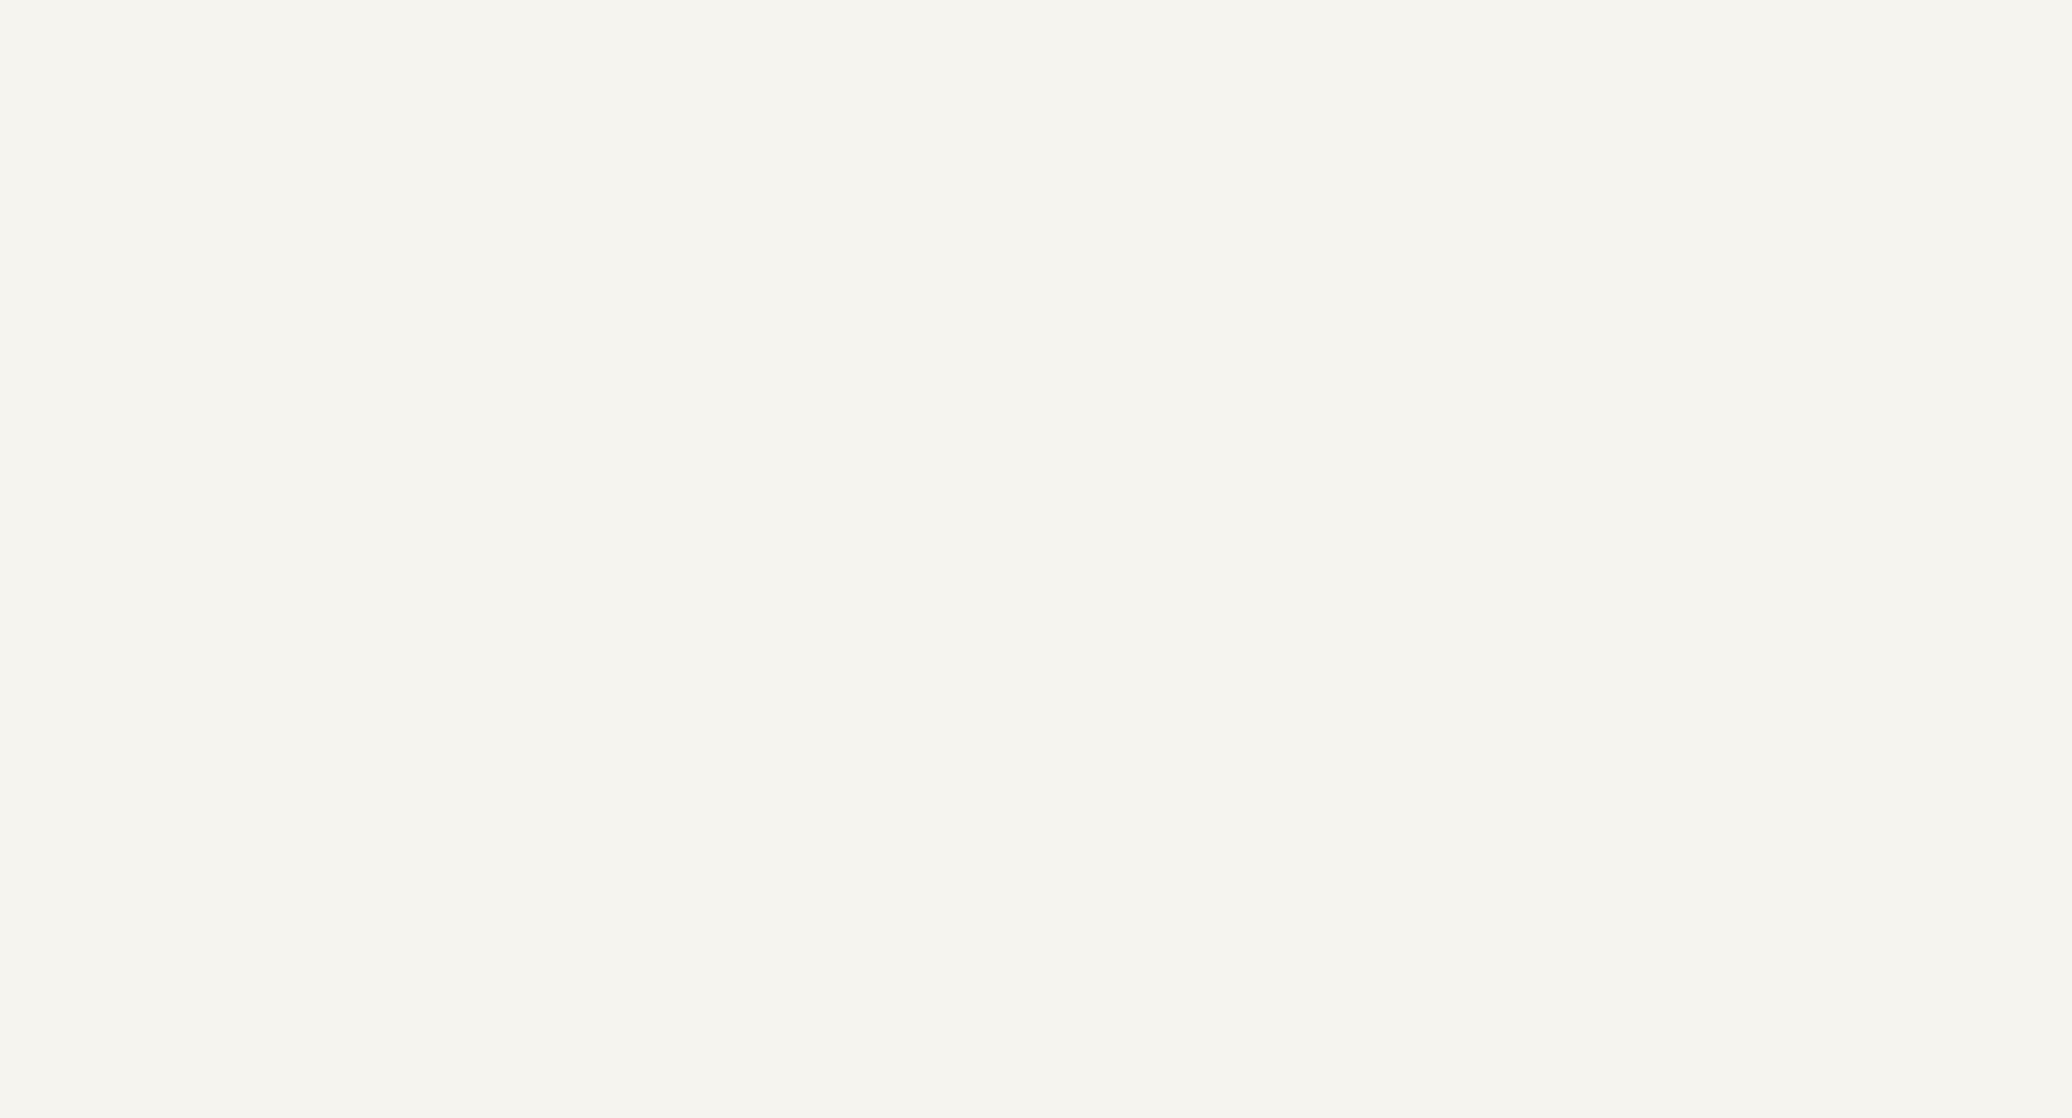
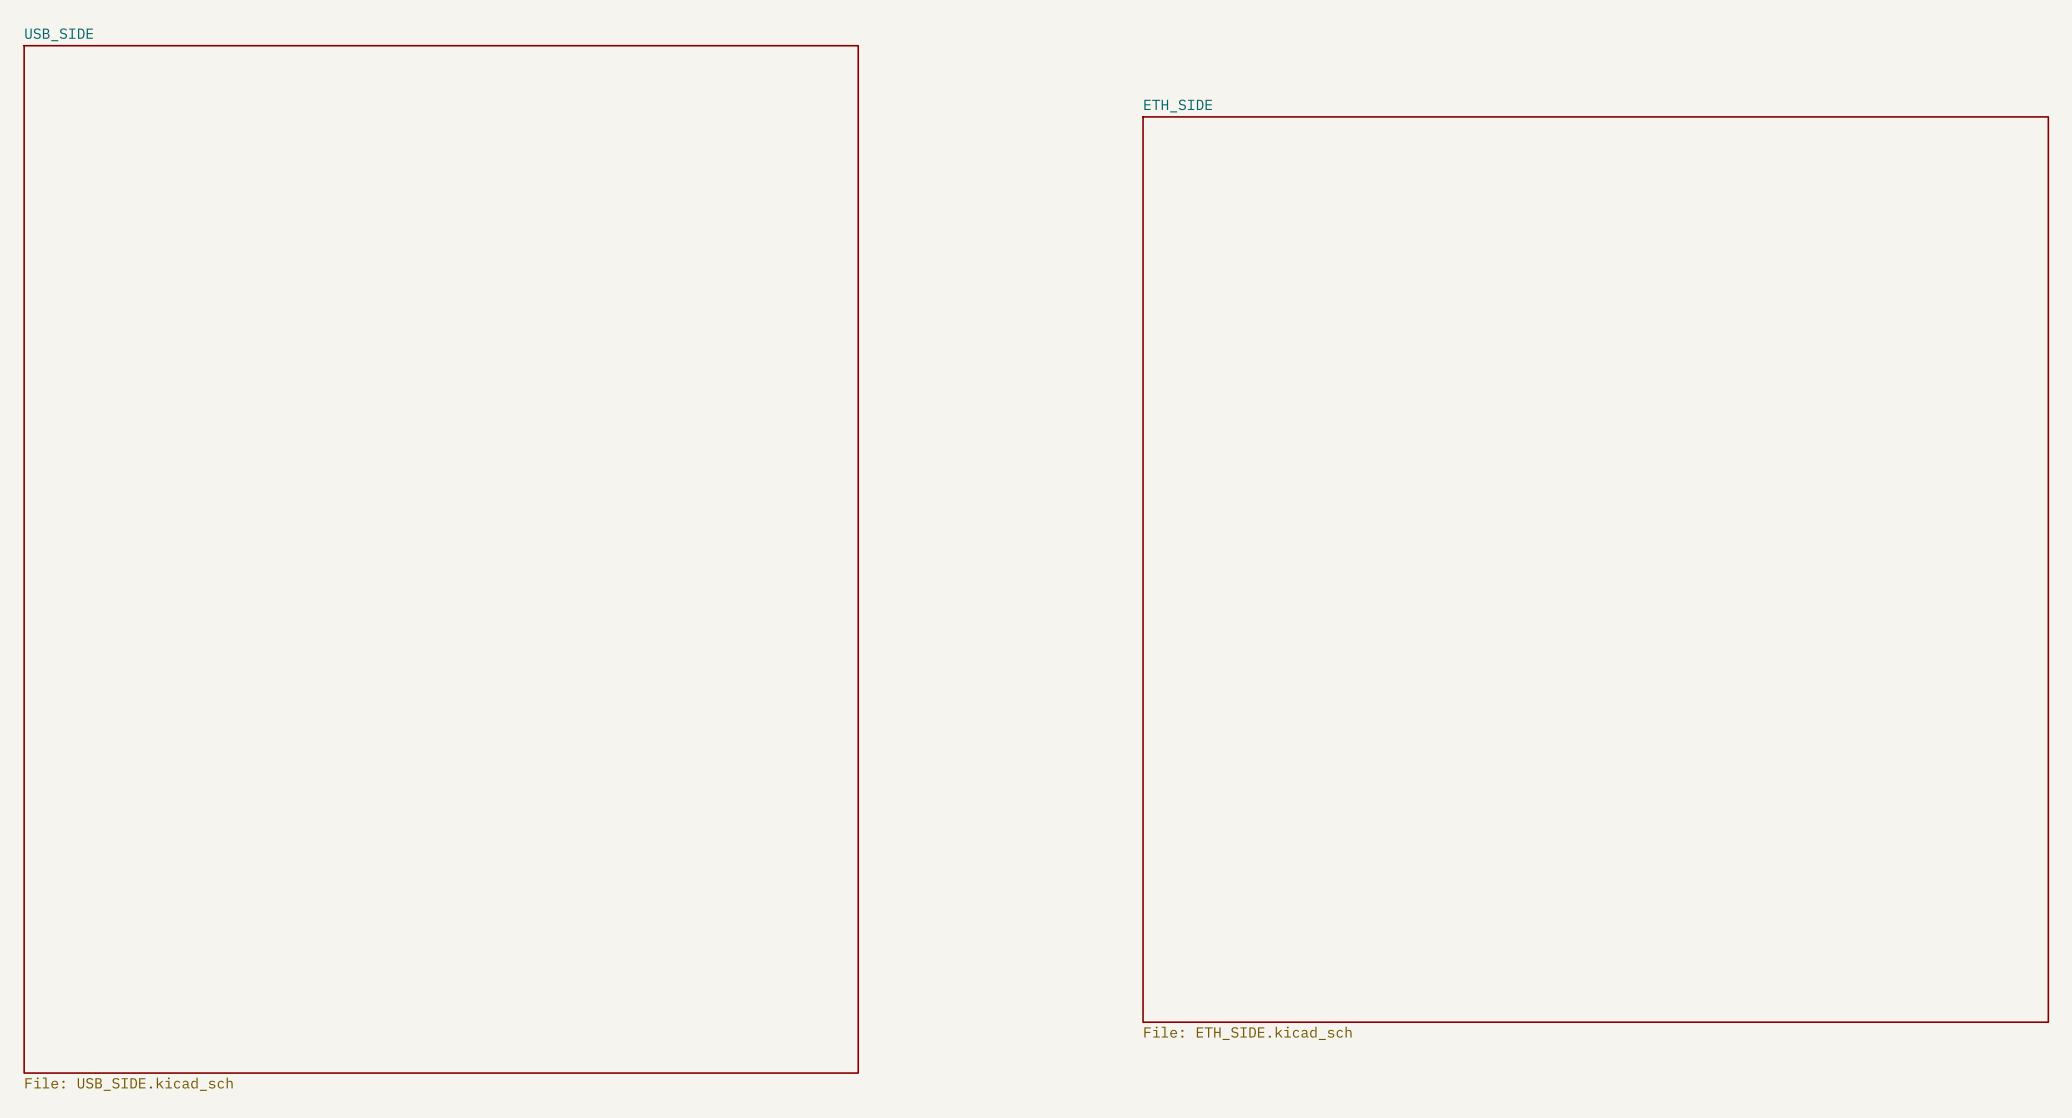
sheet USB_SIDE: none -> File: USB_SIDE.kicad_sch (441, 559)
sheet ETH_SIDE: none -> File: ETH_SIDE.kicad_sch (1595, 569)

